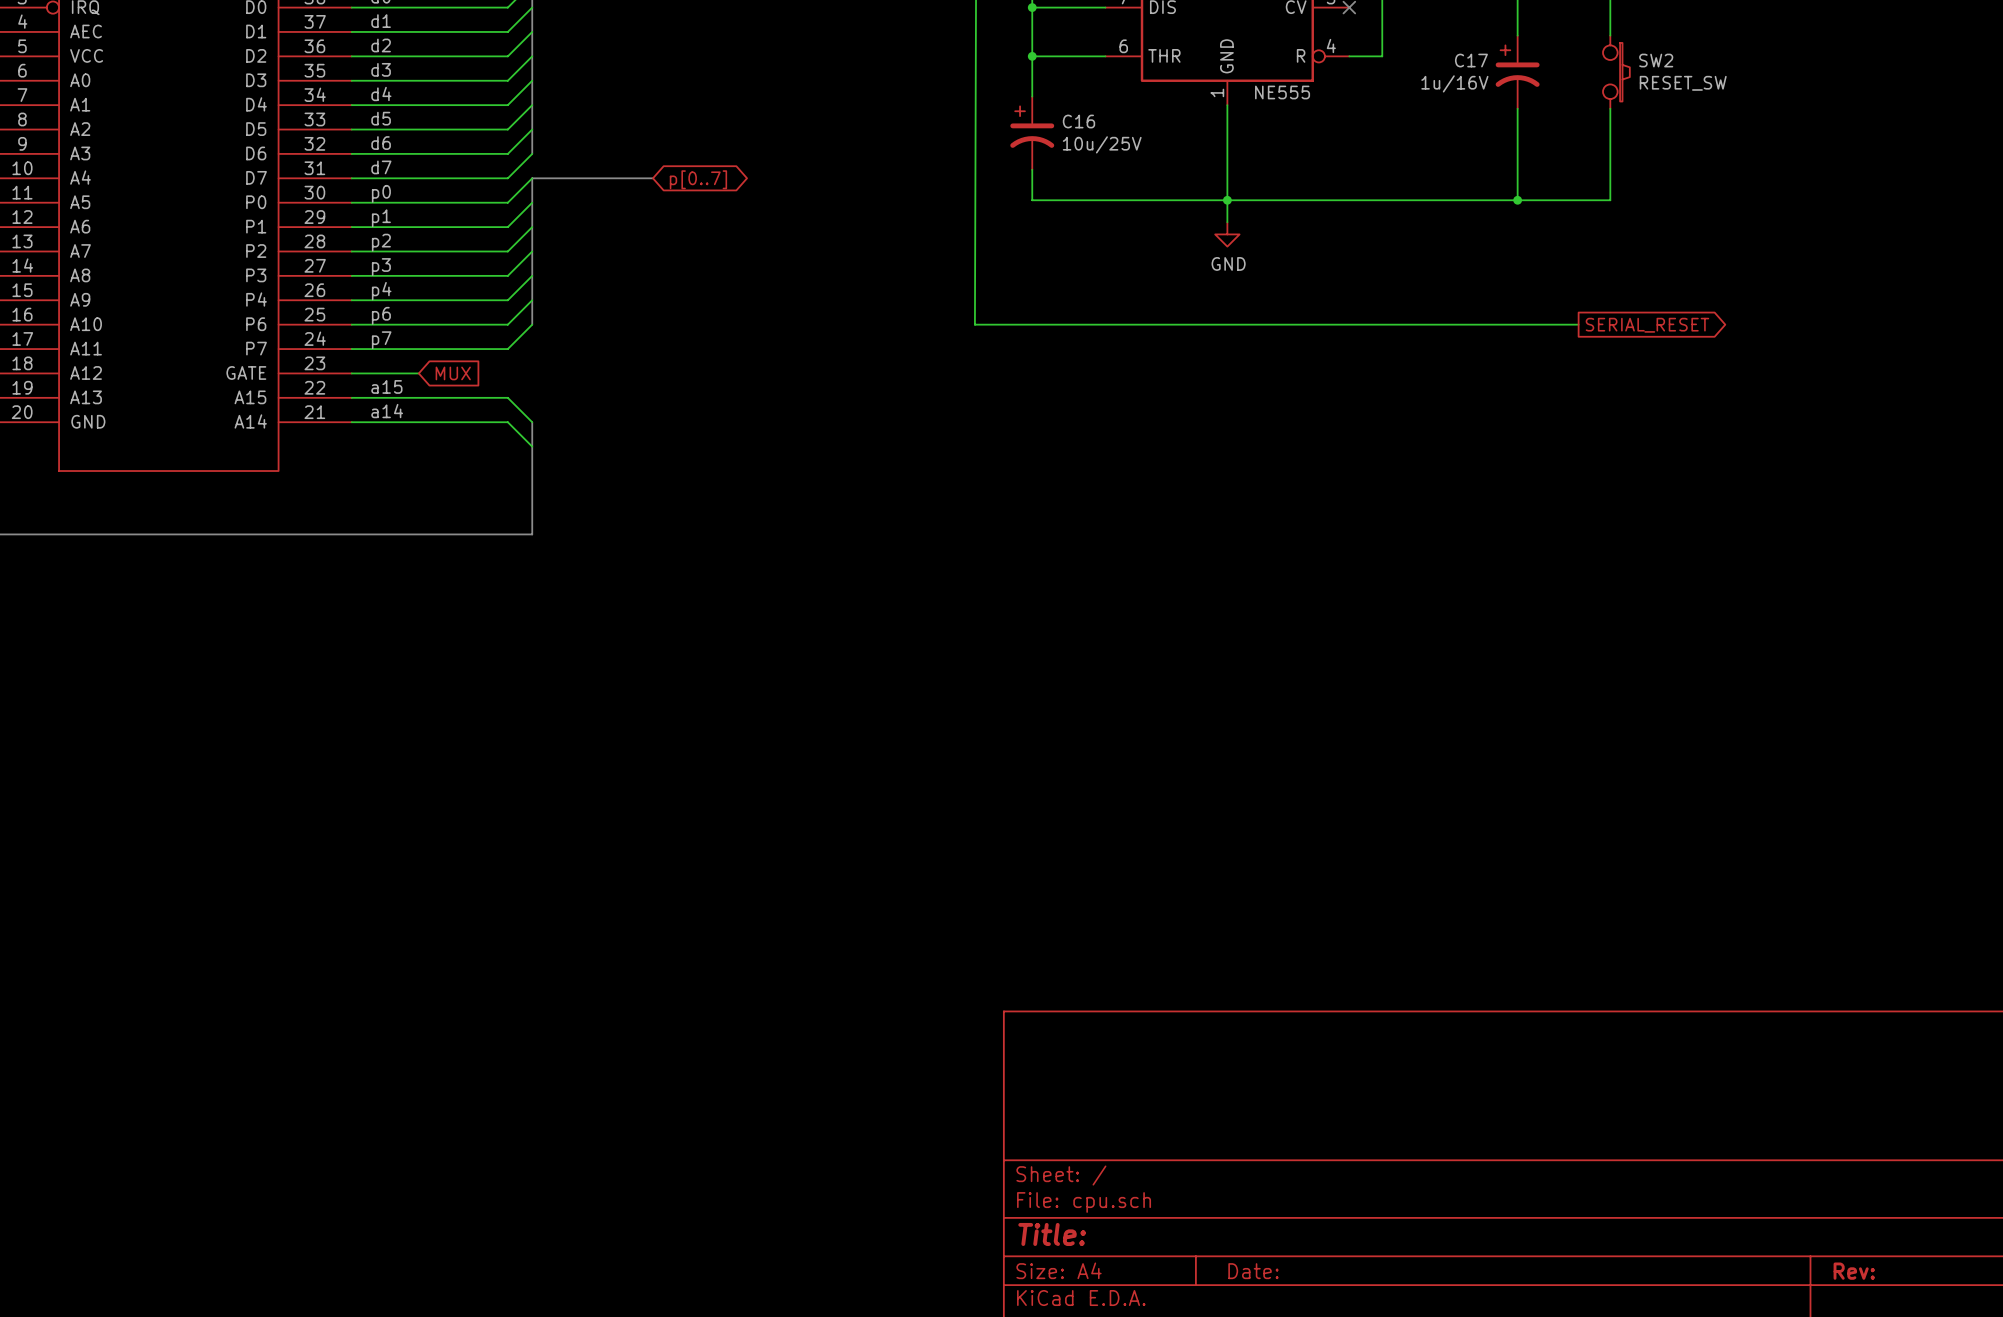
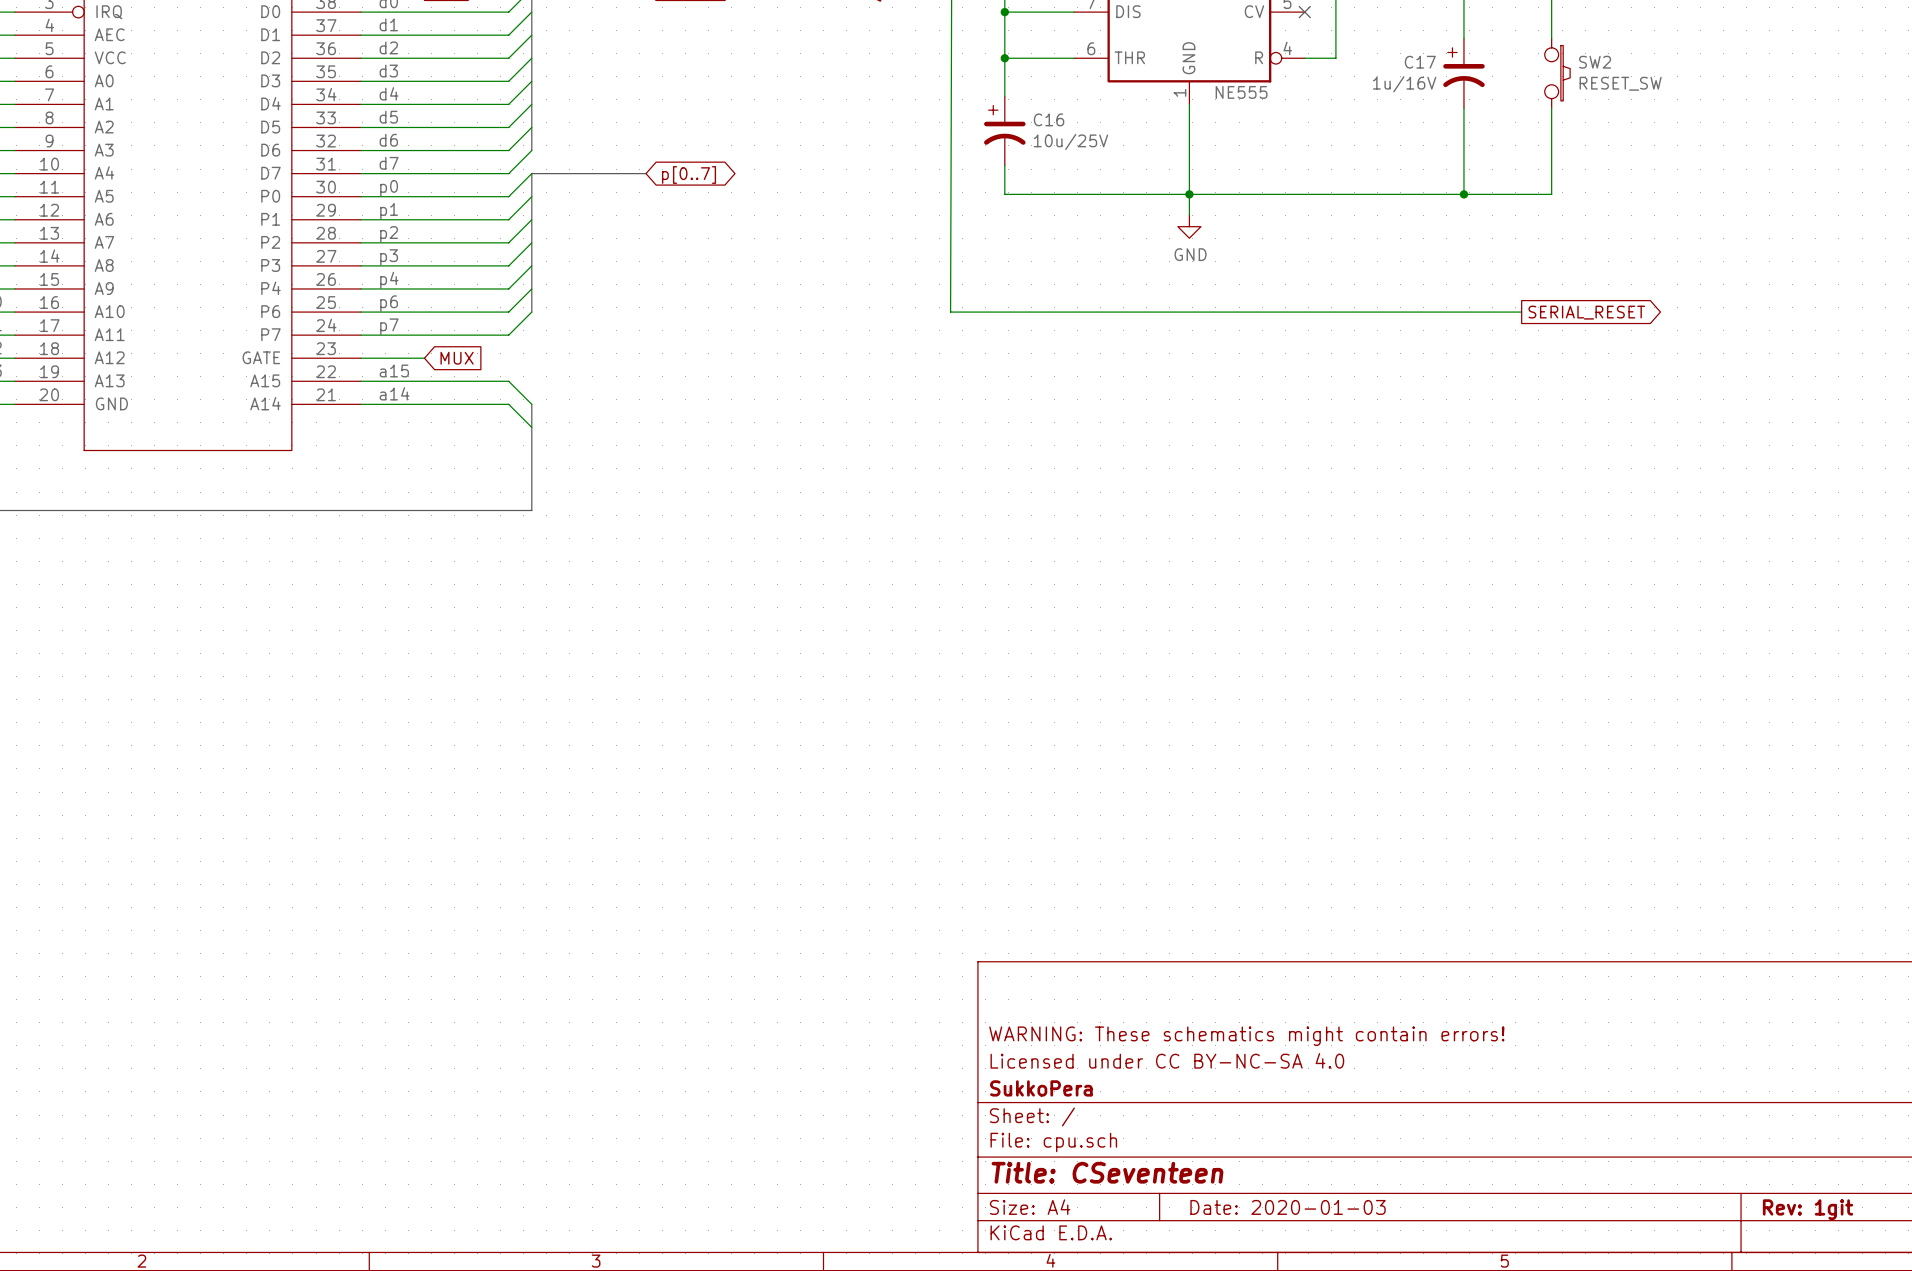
title block: none -> WARNING: These schematics might contain errors! (1246, 1036)
title block: none -> Licensed under CC BY-NC-SA 4.0 (1167, 1060)
title block: none -> SukkoPera (1041, 1088)
title block: Title: (1052, 1234) -> Title: CSeventeen (1107, 1172)
title block: Date: (1253, 1271) -> Date: 2020-01-03 (1288, 1207)
title block: Rev: (1854, 1271) -> Rev: 1git (1808, 1209)

